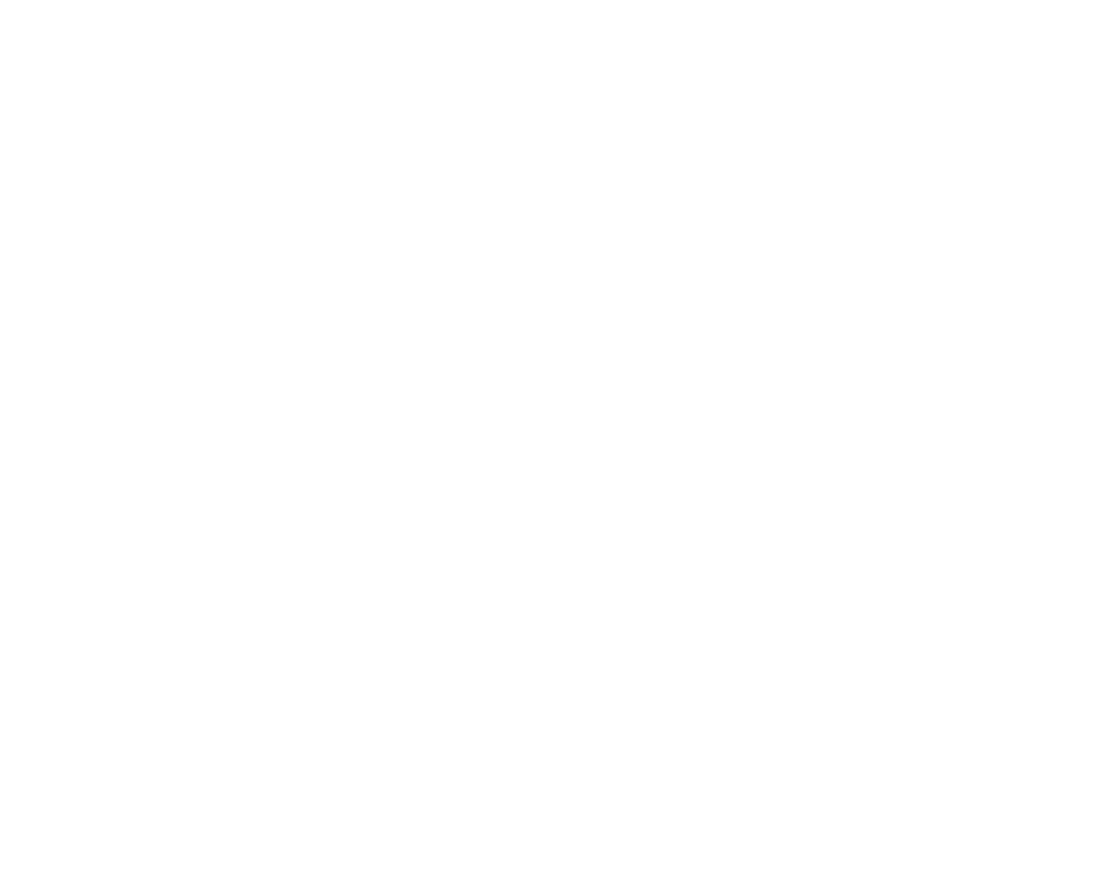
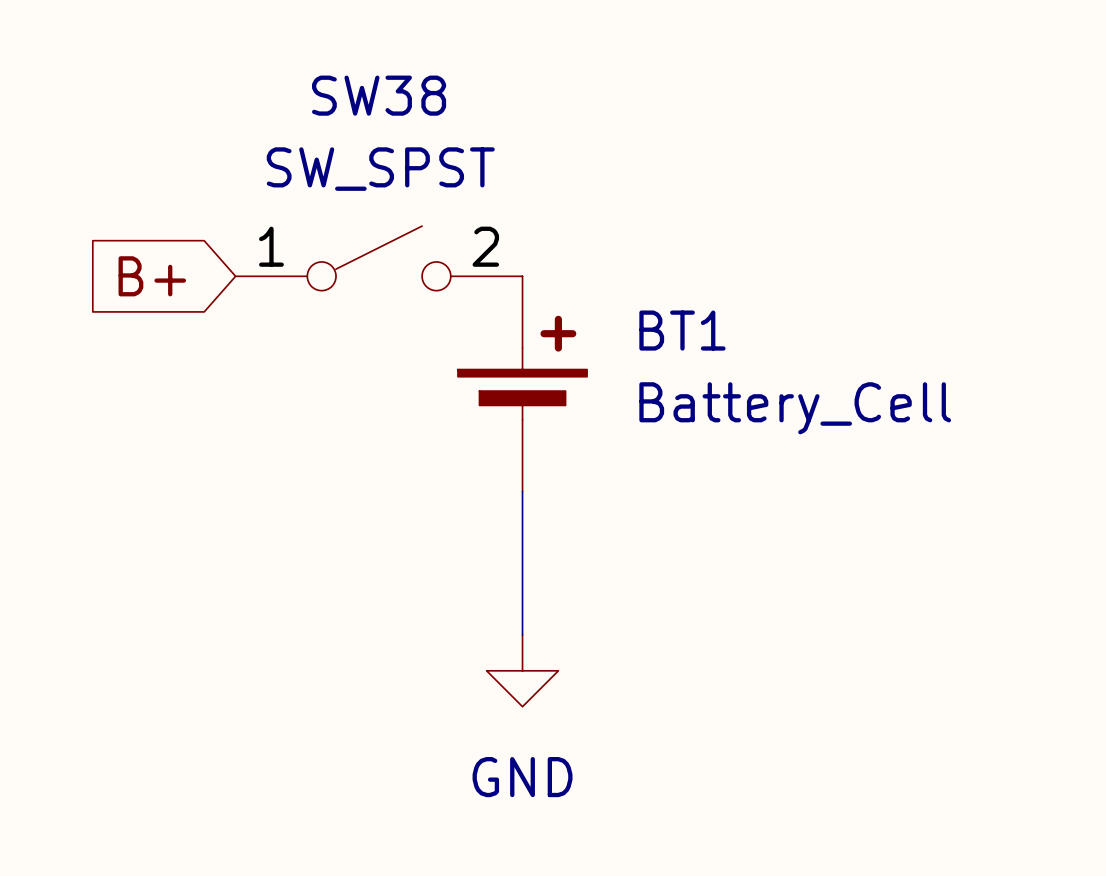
SW38: none -> SW_SPST (379, 258)
global label: none -> B+ (152, 276)
BT1: none -> Battery_Cell (522, 383)
wire: none -> (522, 491) (522, 634)
power symbol: none -> GND (522, 670)

